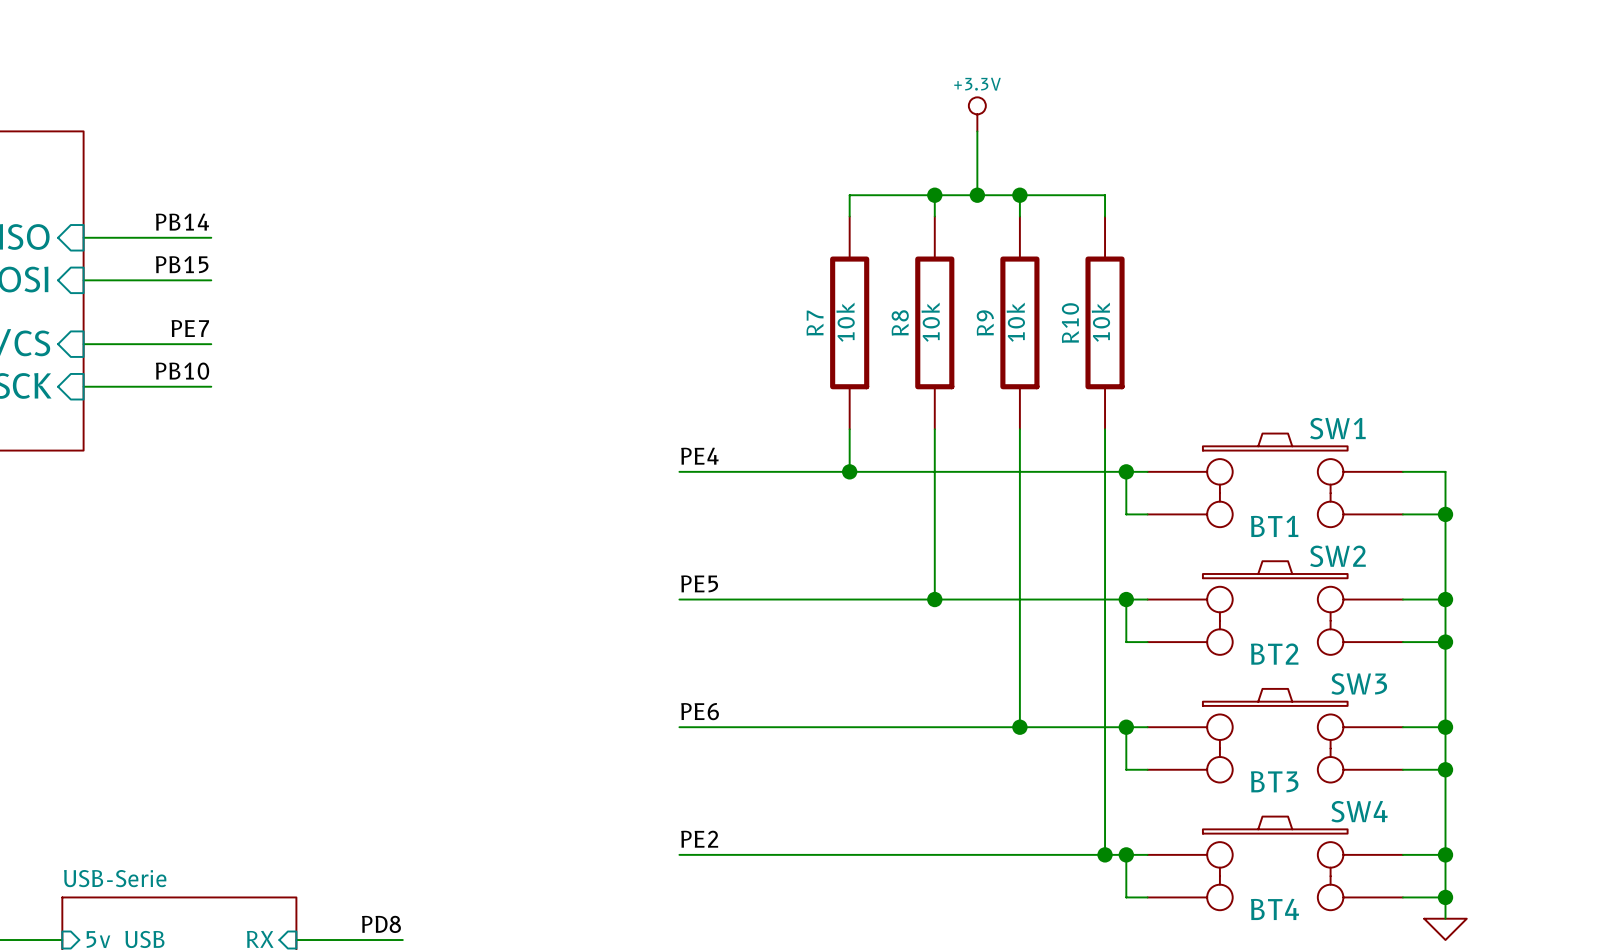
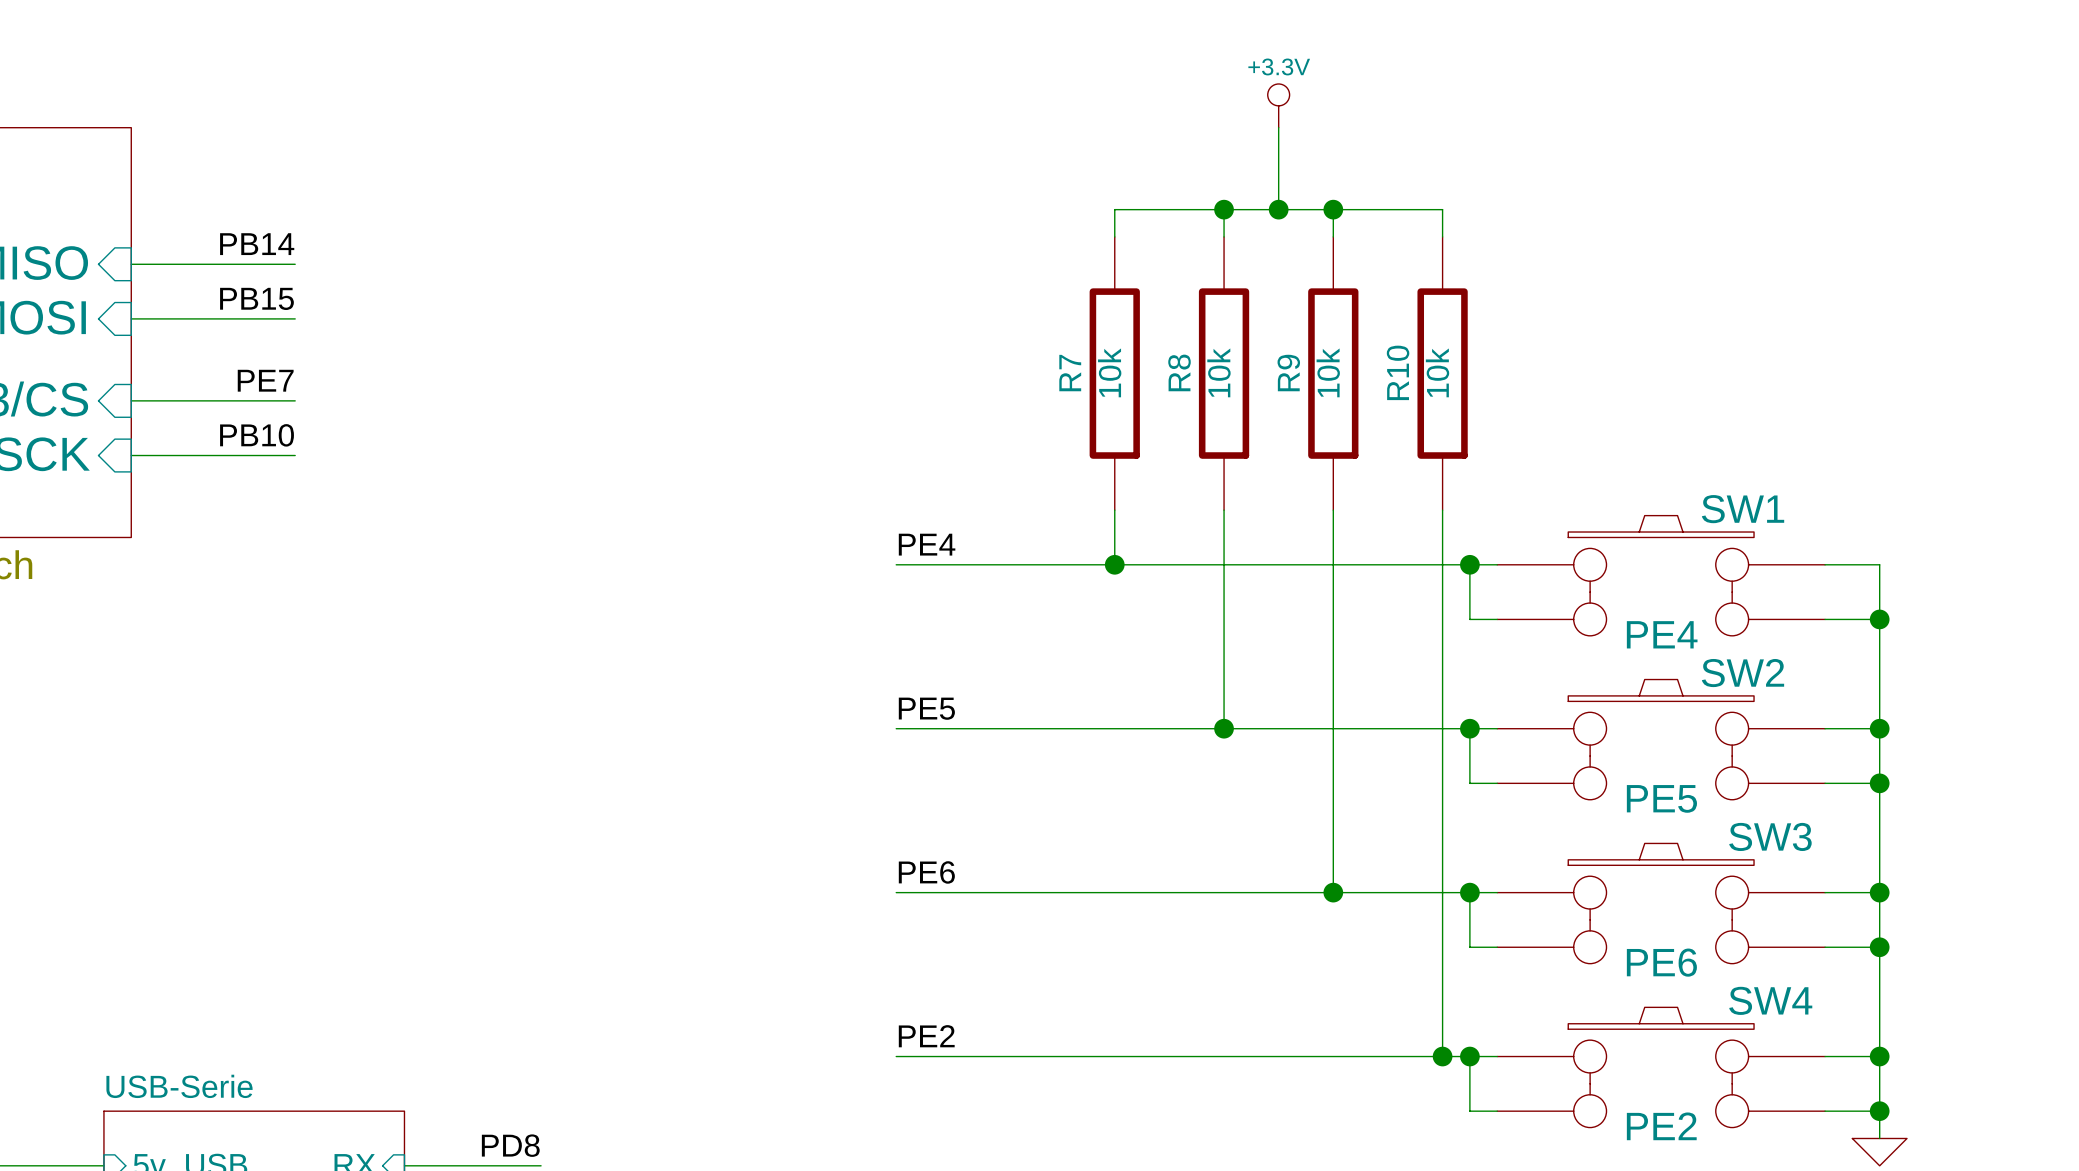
SW1 value: BT1 (1274, 526) -> PE4 (1662, 634)
SW2 value: BT2 (1274, 654) -> PE5 (1661, 798)
SW3 value: BT3 (1274, 781) -> PE6 (1661, 962)
SW4 value: BT4 (1274, 909) -> PE2 (1661, 1126)

